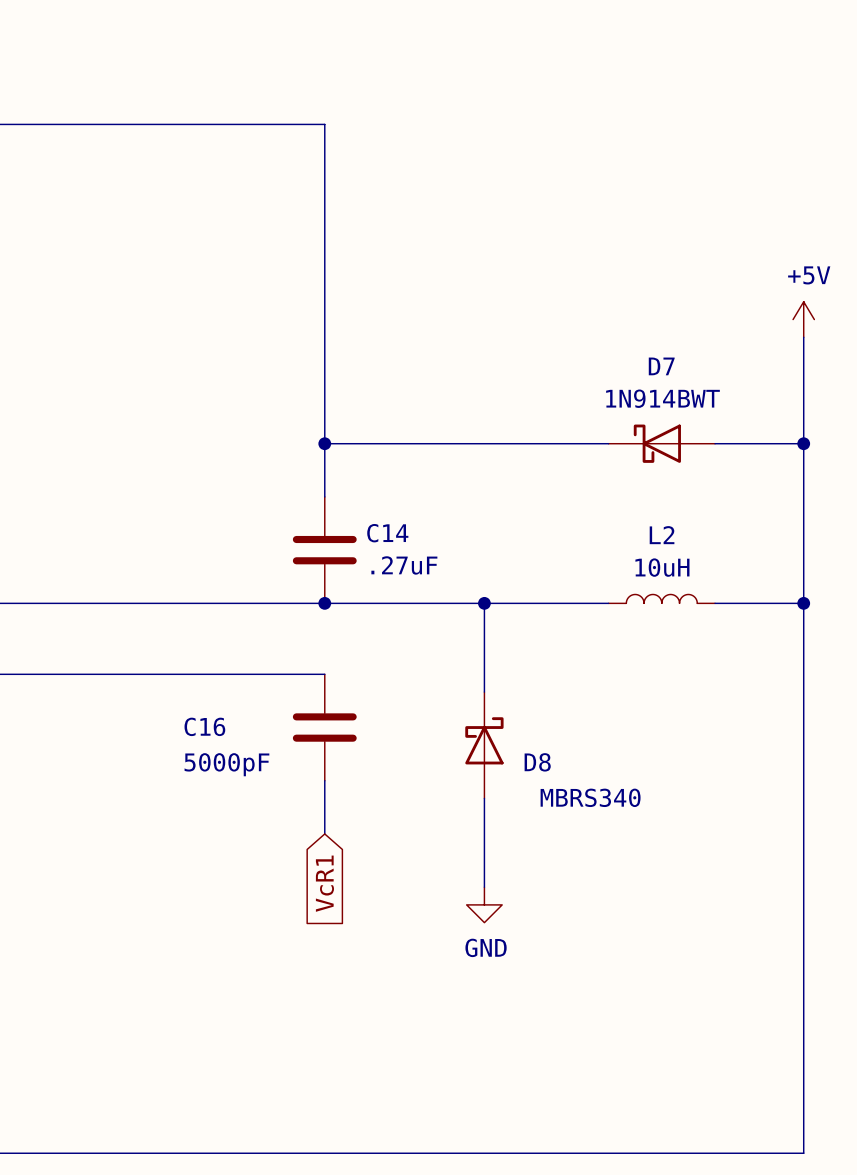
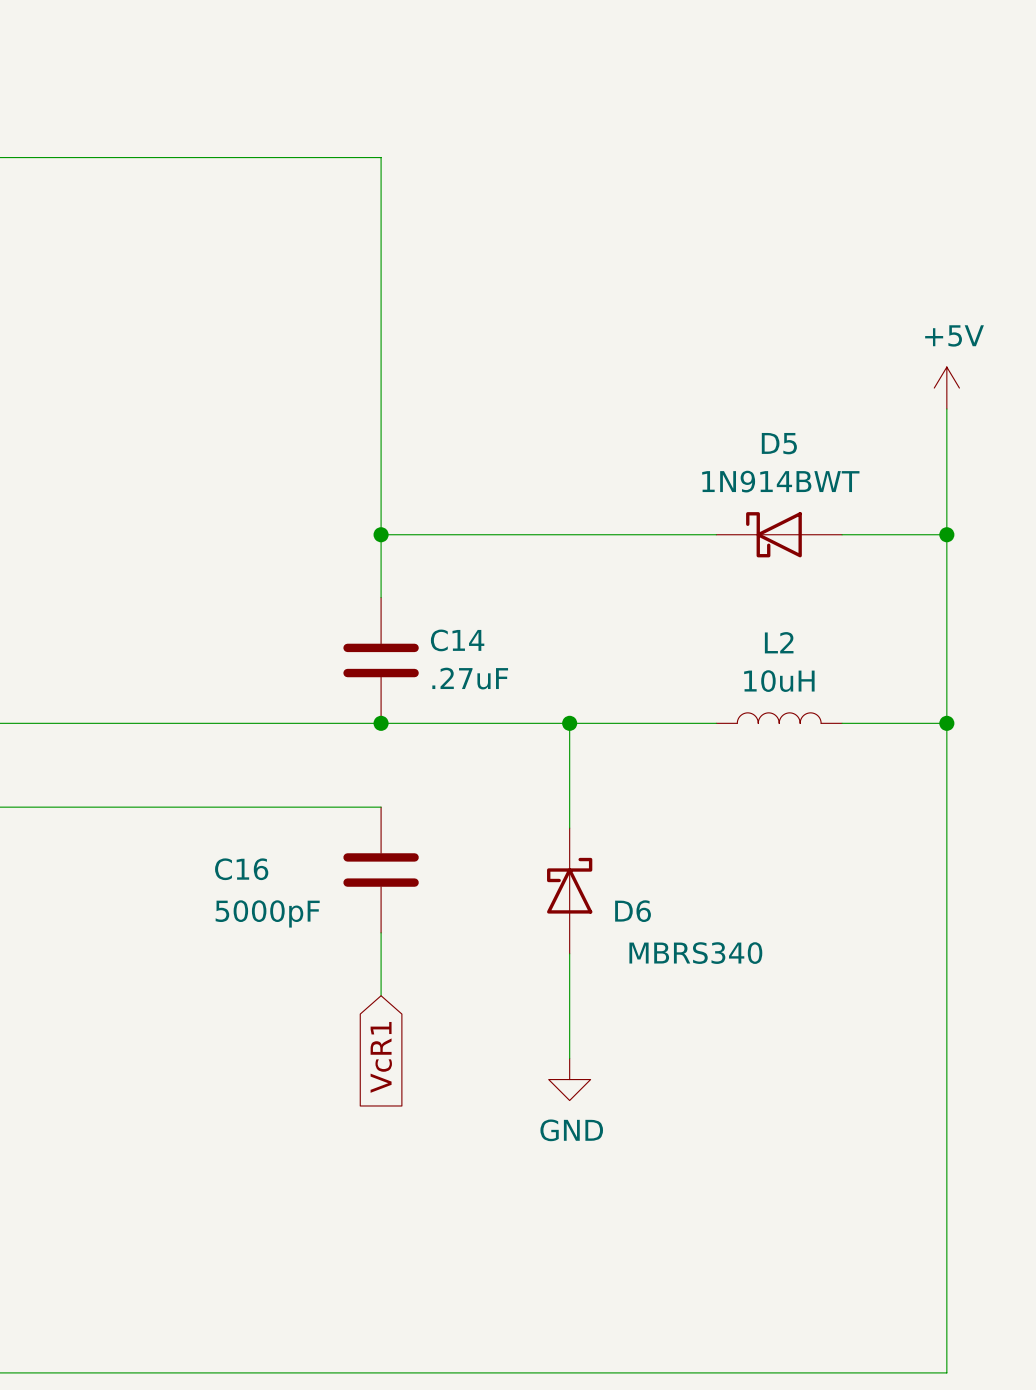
D7 name: D7 (661, 366) -> D5 (779, 443)
D8 name: D8 (537, 762) -> D6 (633, 911)

